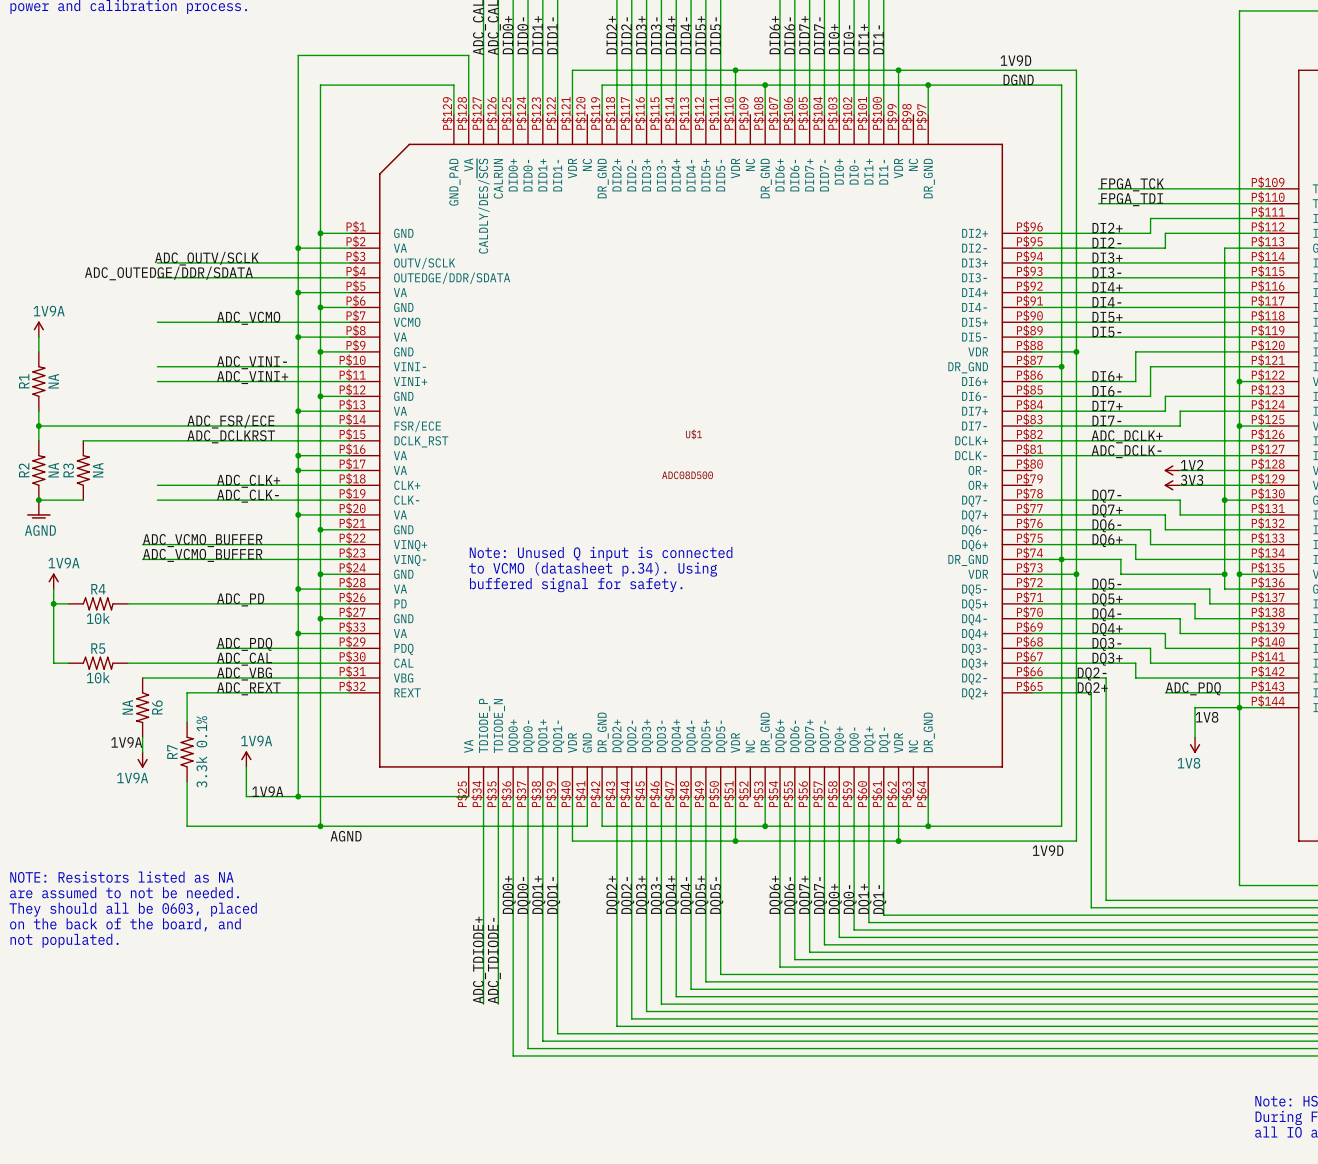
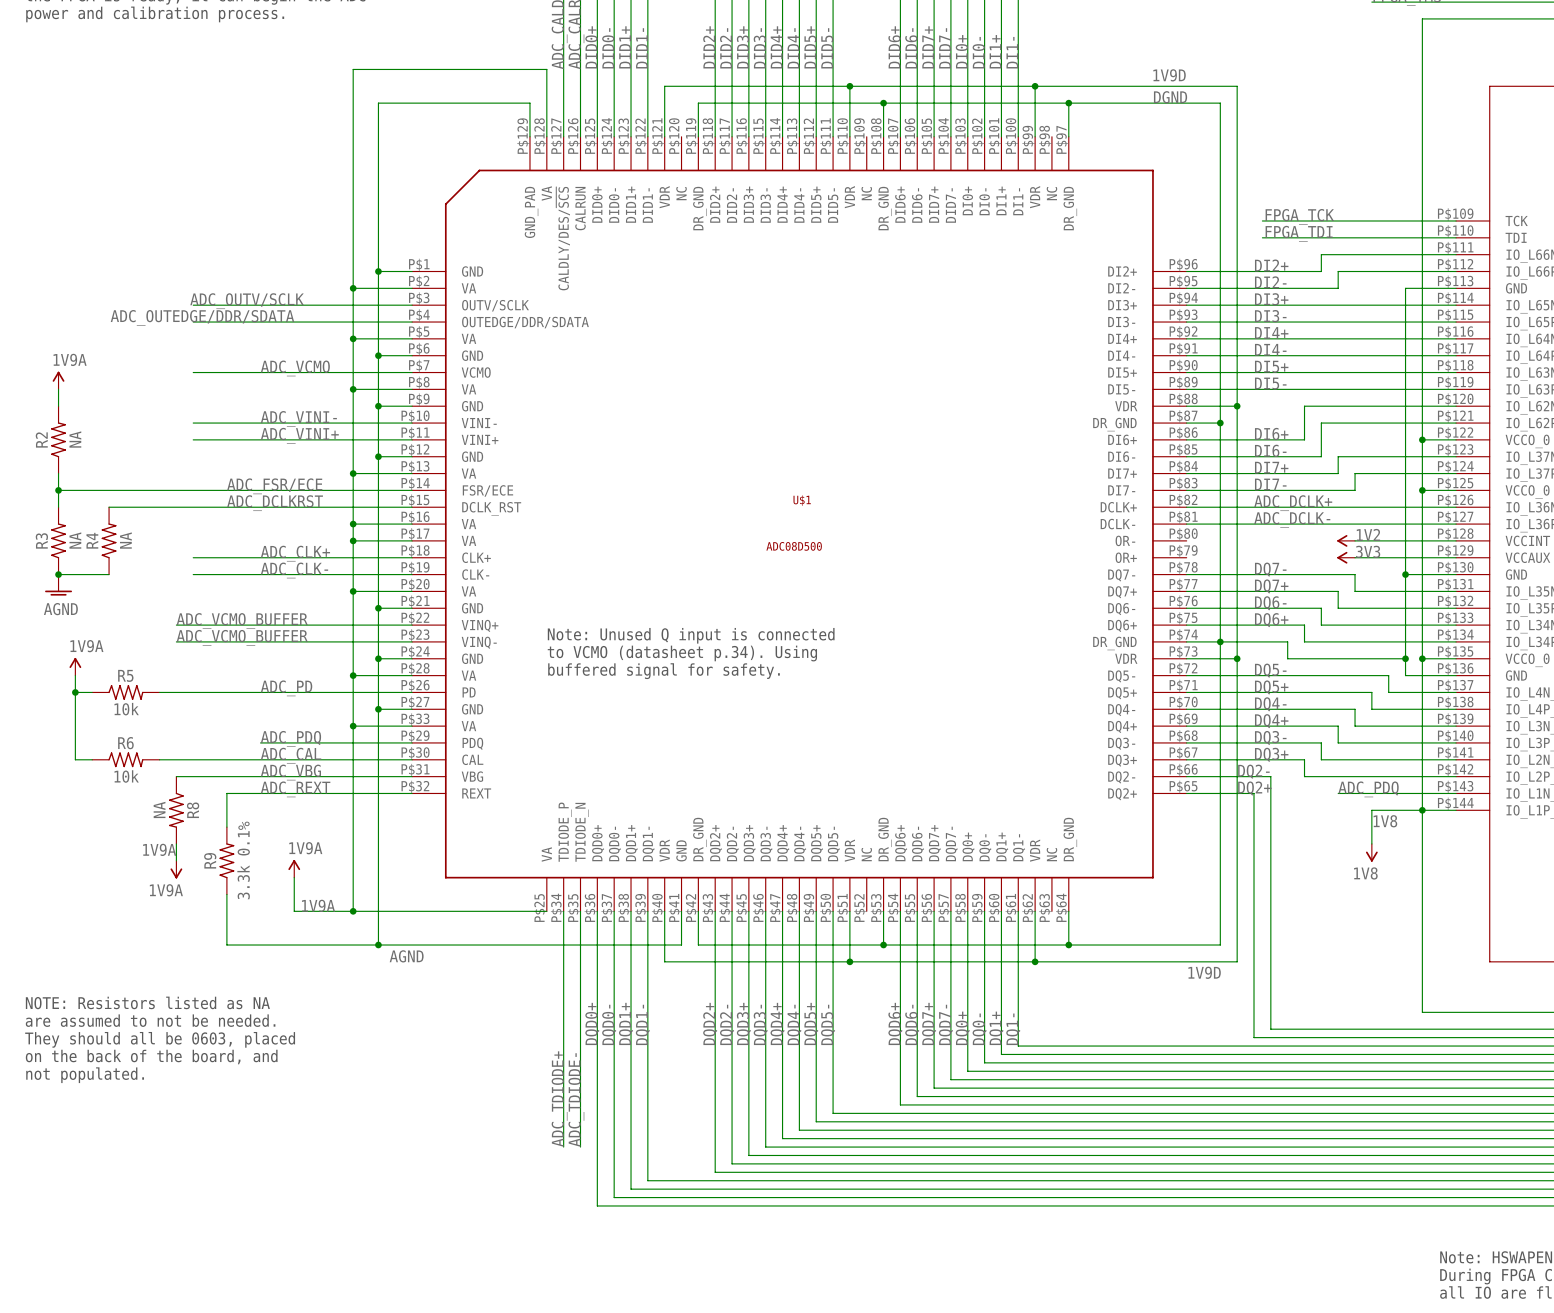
R1 name: R1 (24, 381) -> R2 (41, 439)
R2 name: R2 (24, 470) -> R3 (41, 540)
R3 name: R3 (68, 470) -> R4 (92, 540)
R4 name: R4 (98, 589) -> R5 (125, 675)
R5 name: R5 (98, 648) -> R6 (125, 743)
R6 name: R6 (157, 707) -> R8 (193, 810)
R7 name: R7 (172, 751) -> R9 (210, 860)

